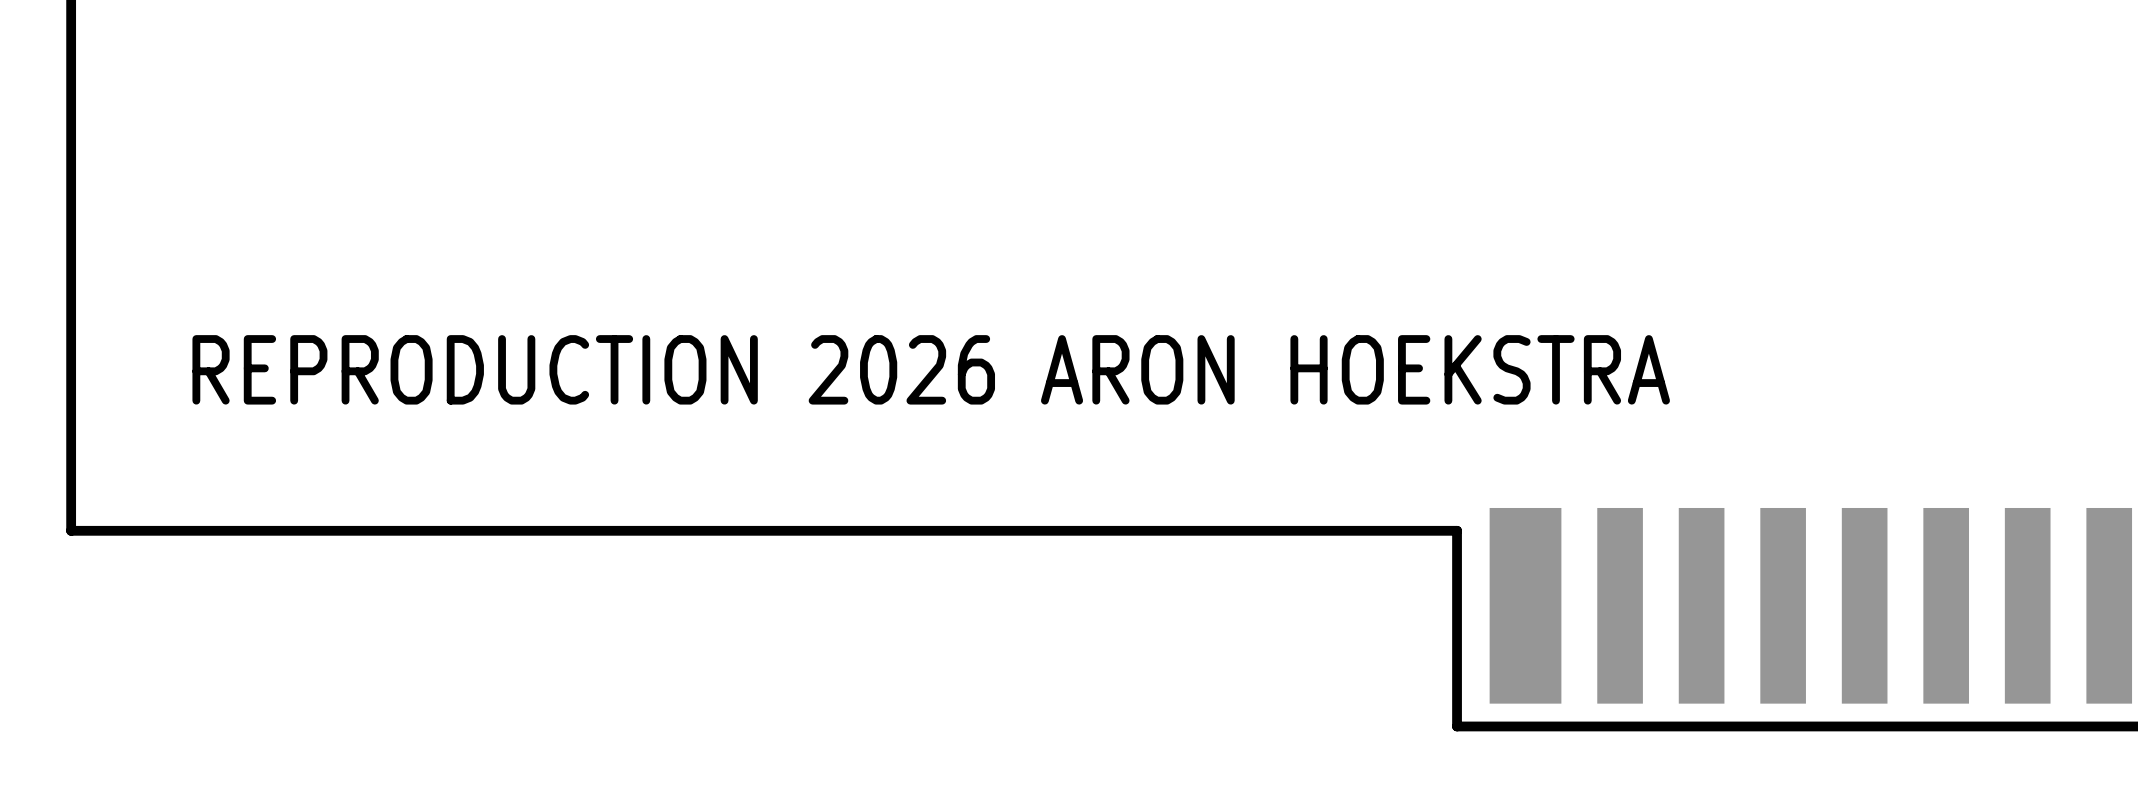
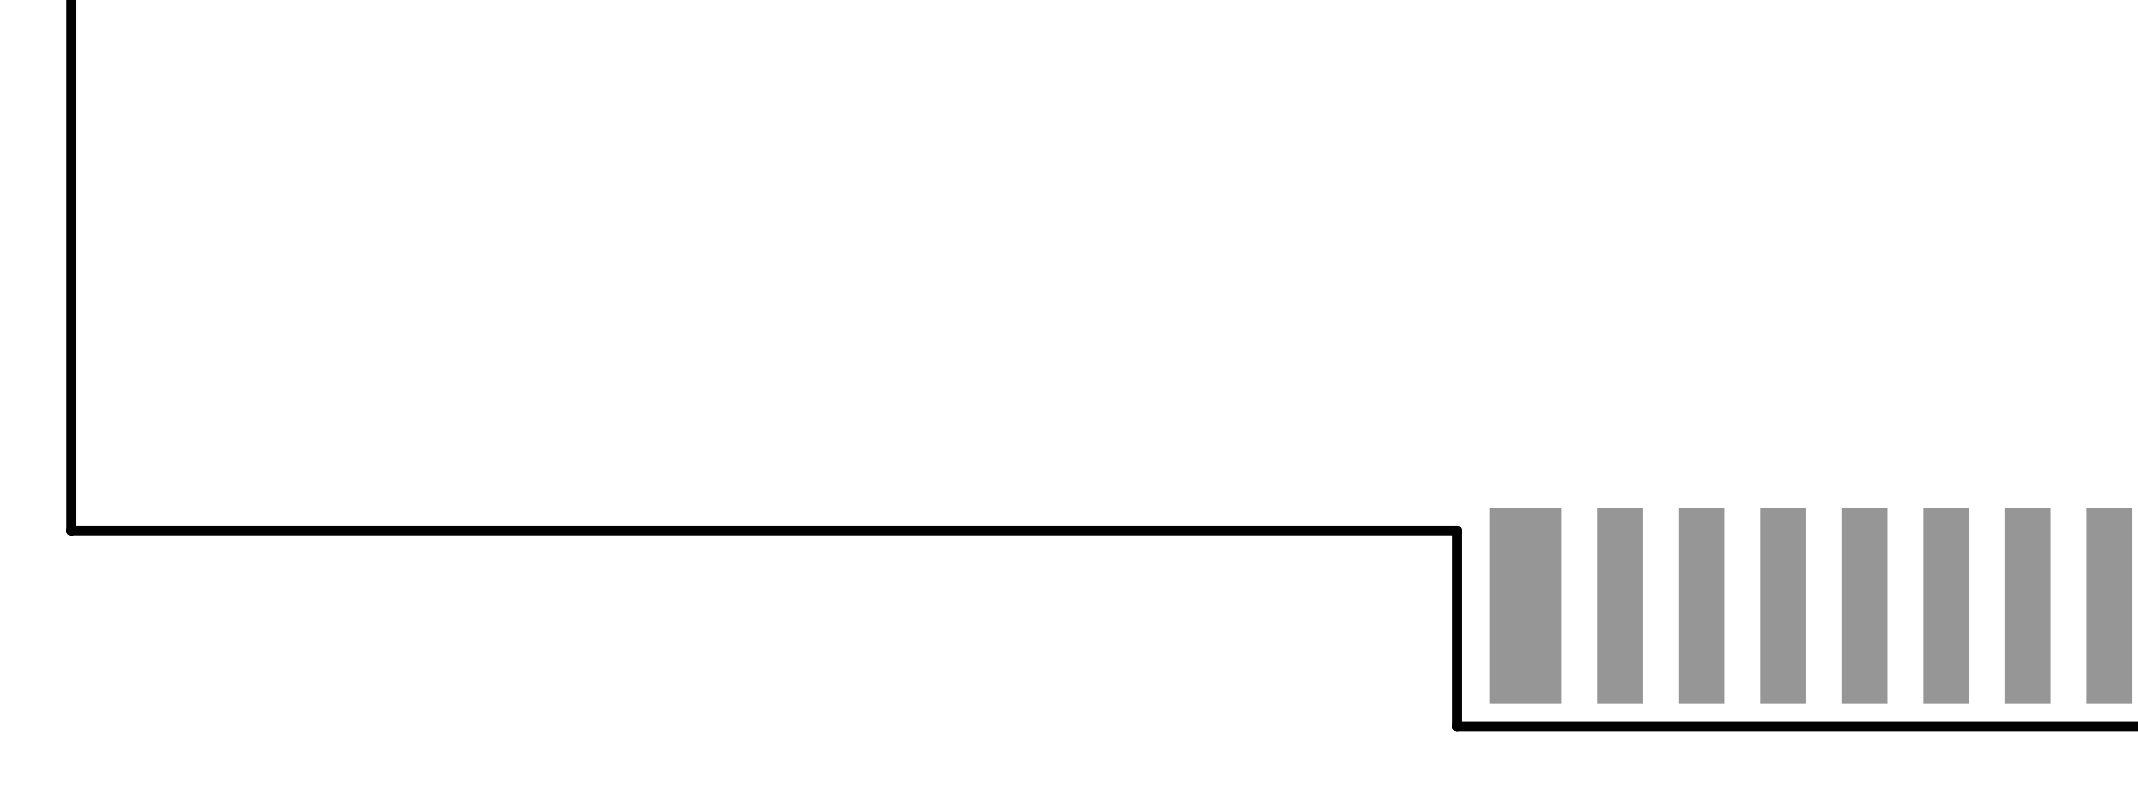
text: REPRODUCTION 2026 ARON HOEKSTRA (931, 369) -> none

